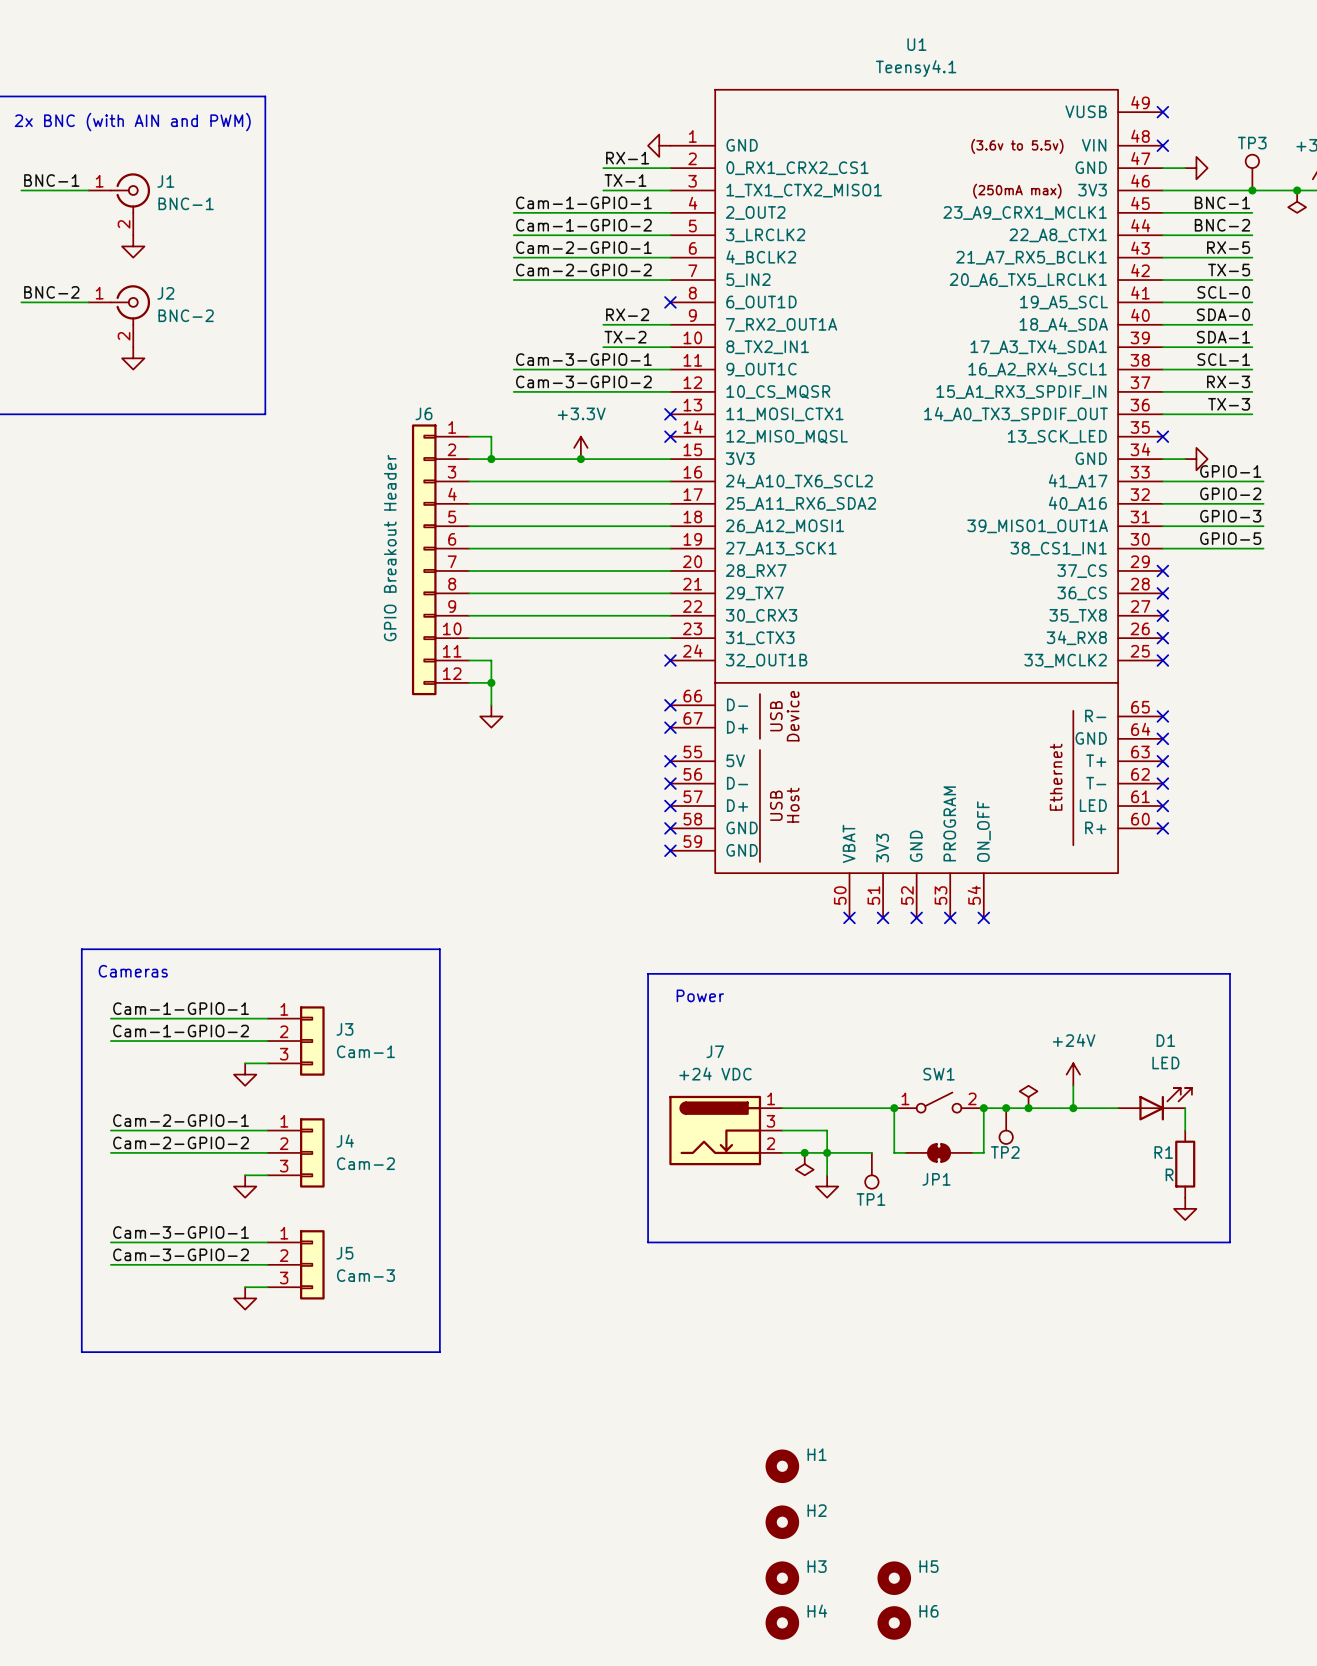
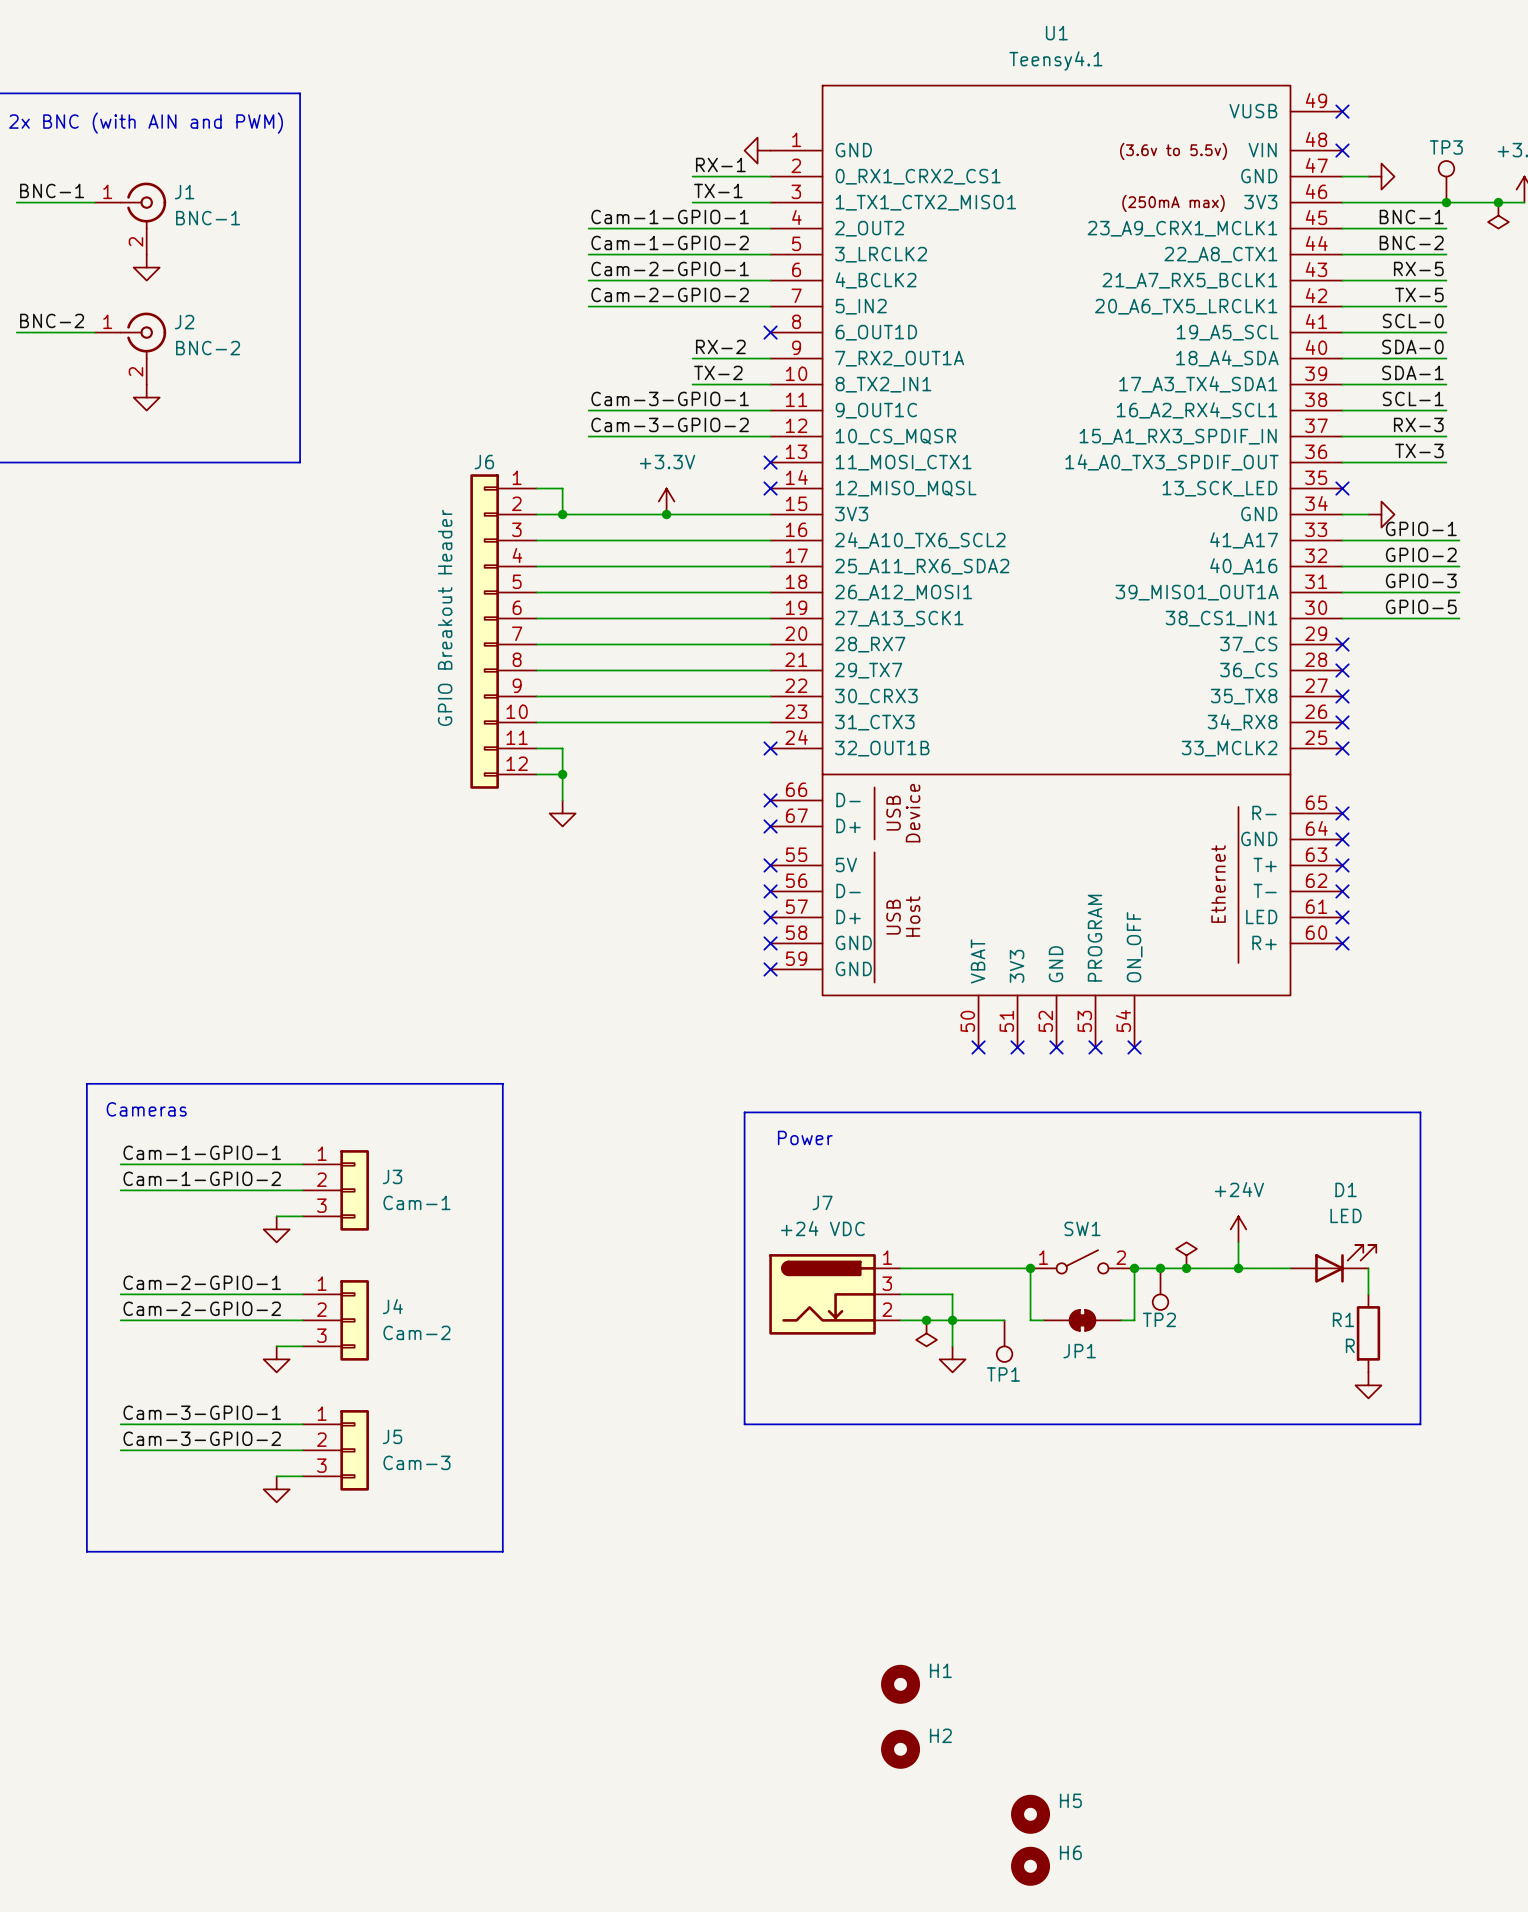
H3: (782, 1578) -> none
H4: (782, 1622) -> none

